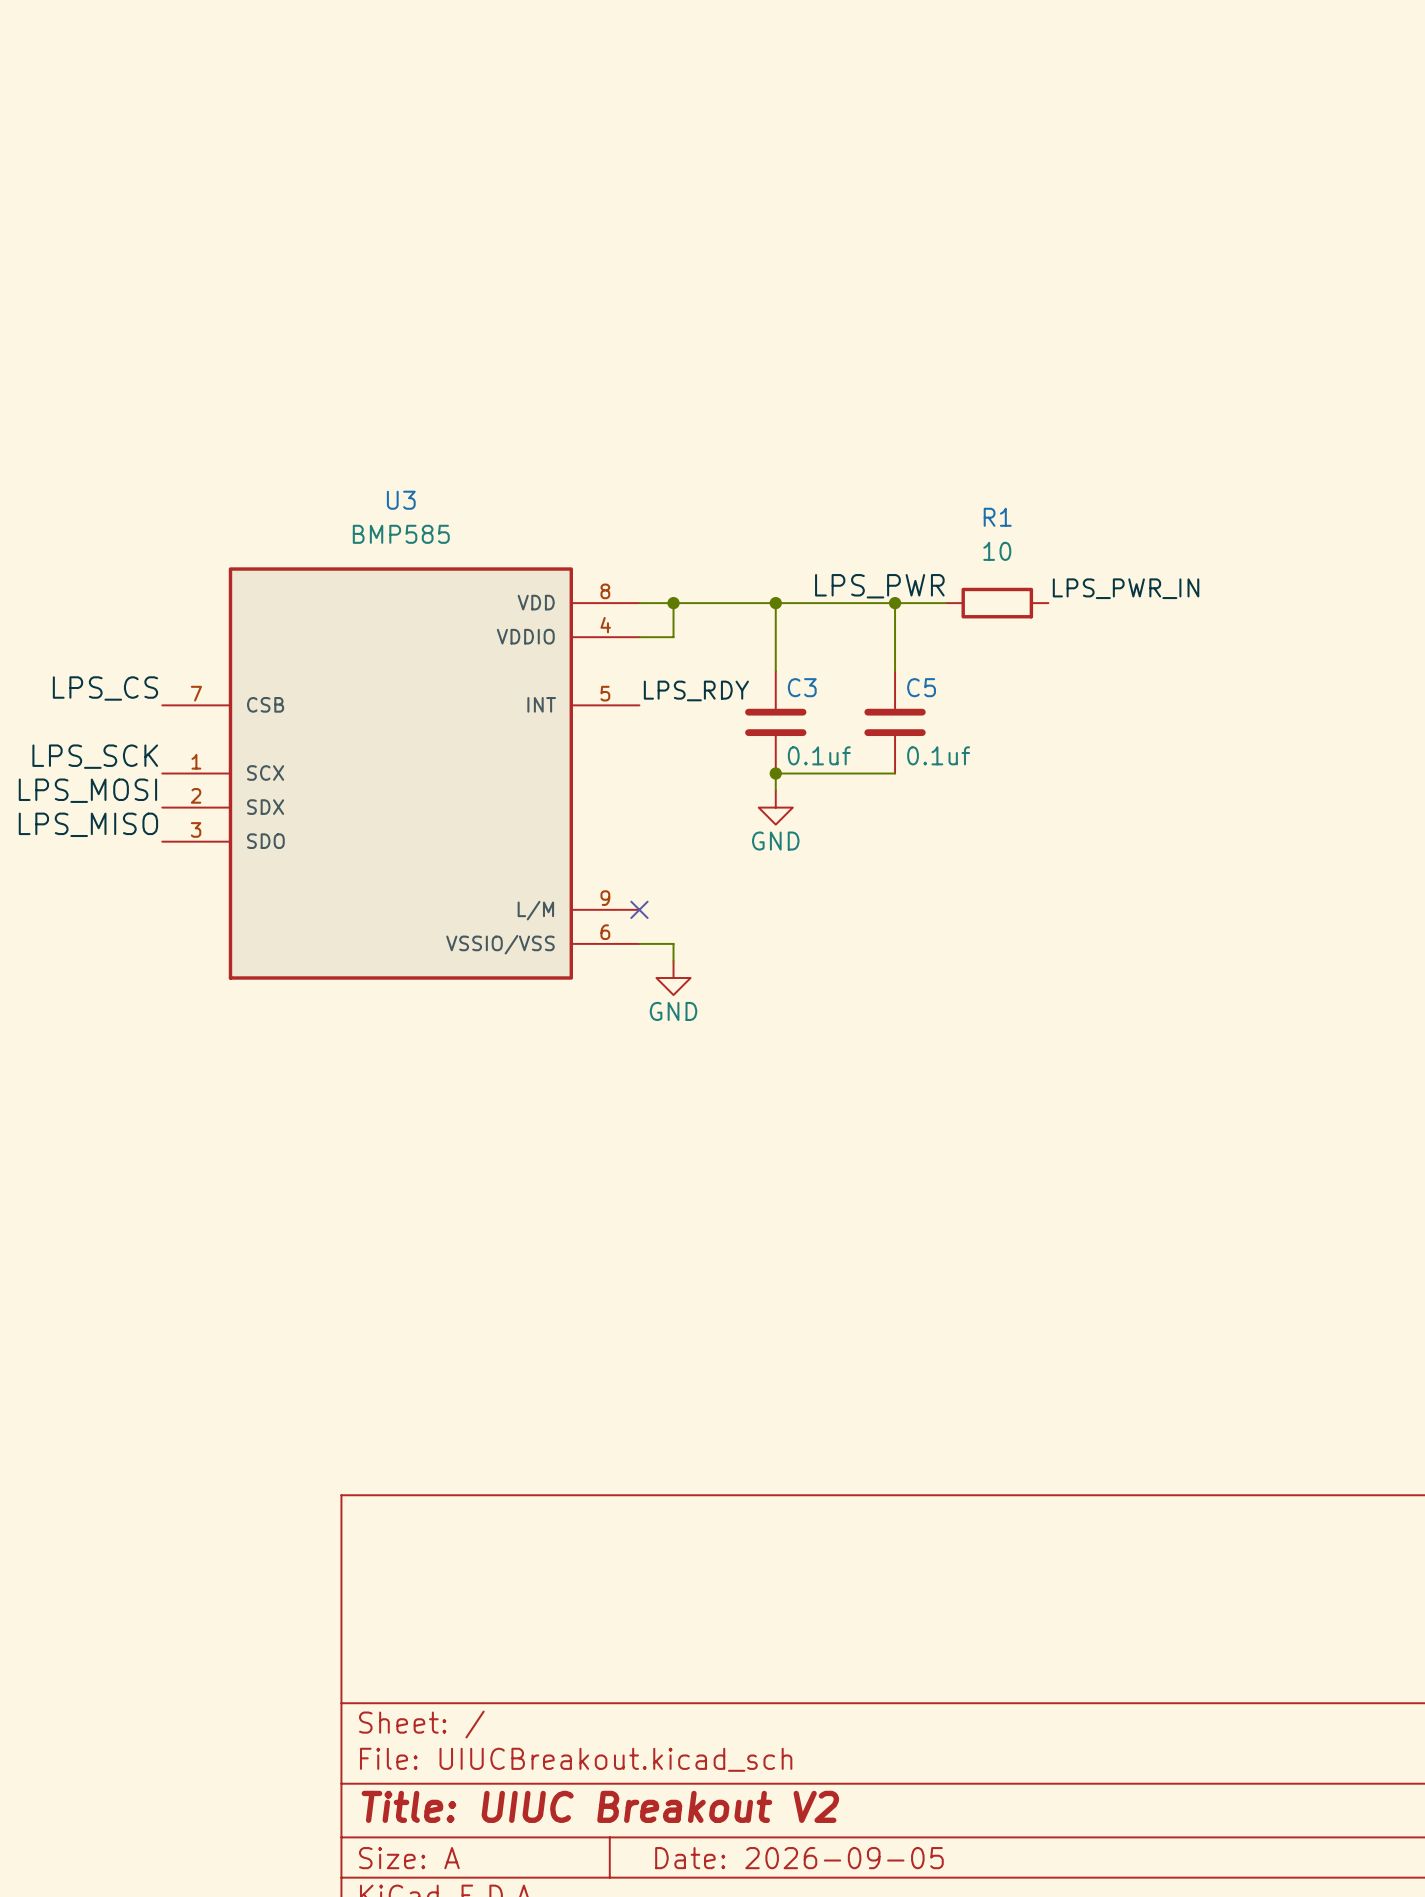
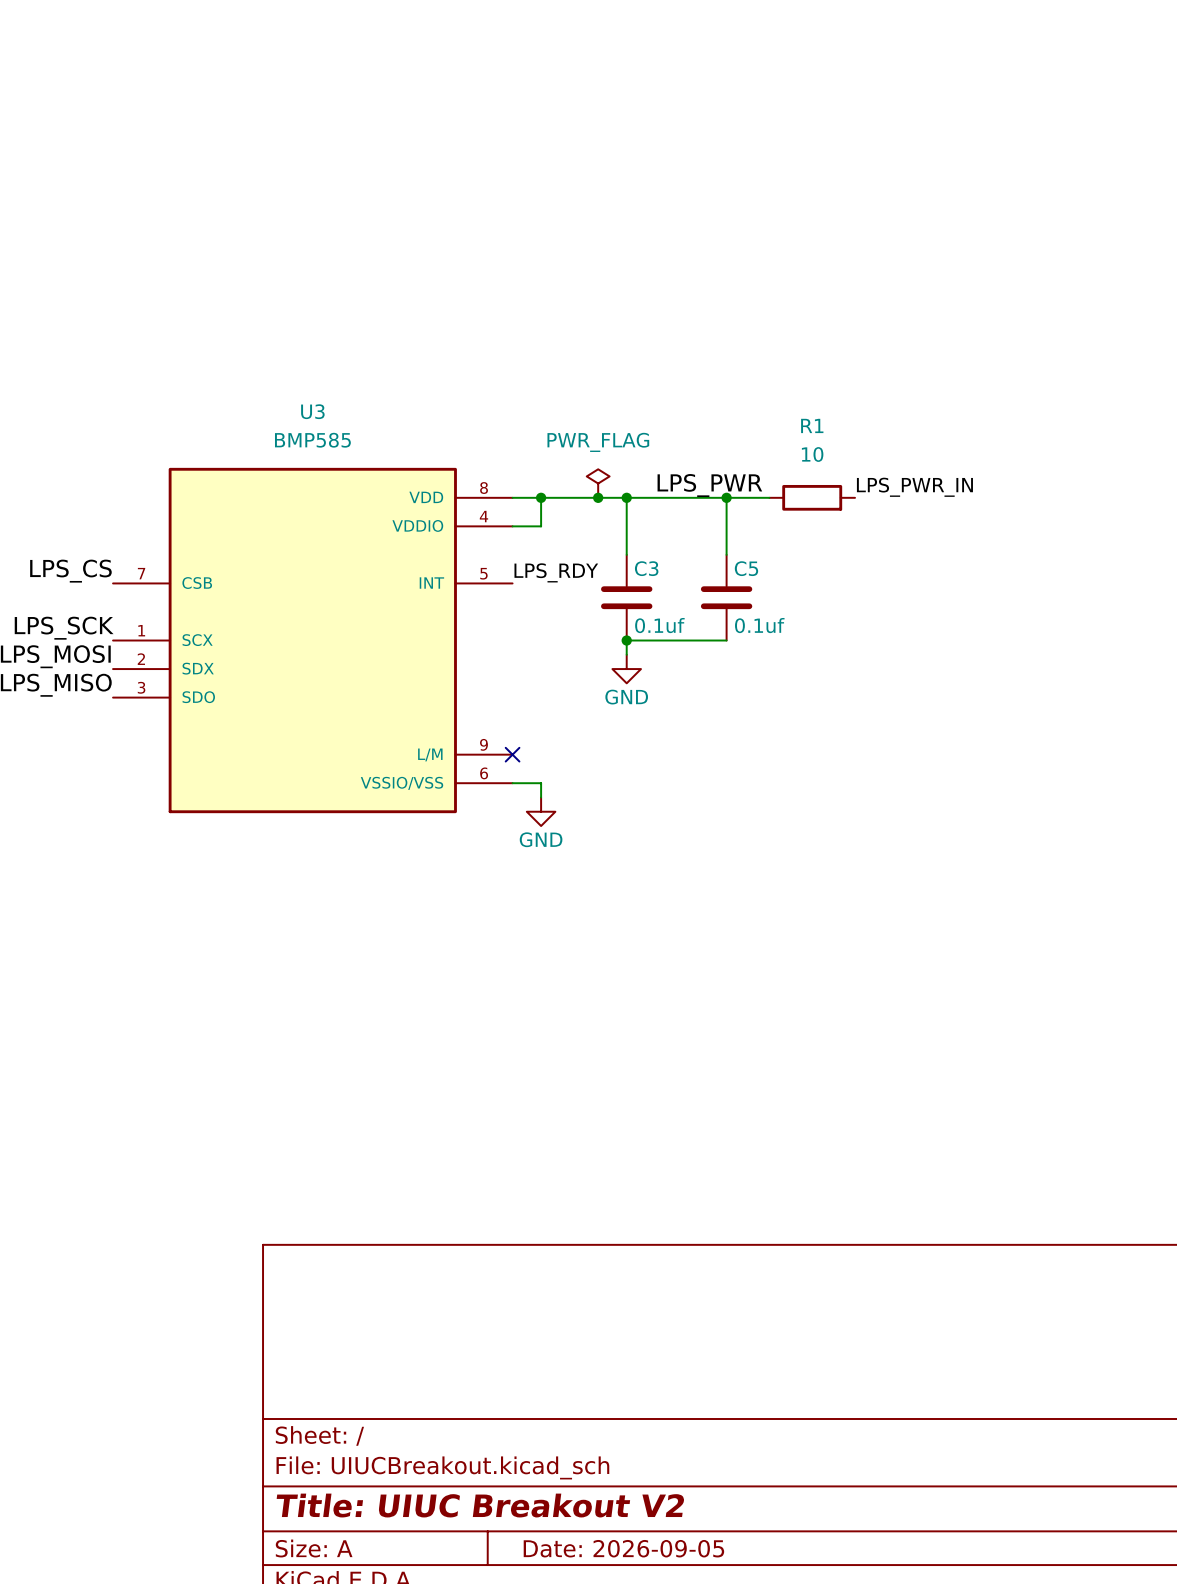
power symbol: none -> PWR_FLAG (598, 483)
junction: none -> (598, 497)

